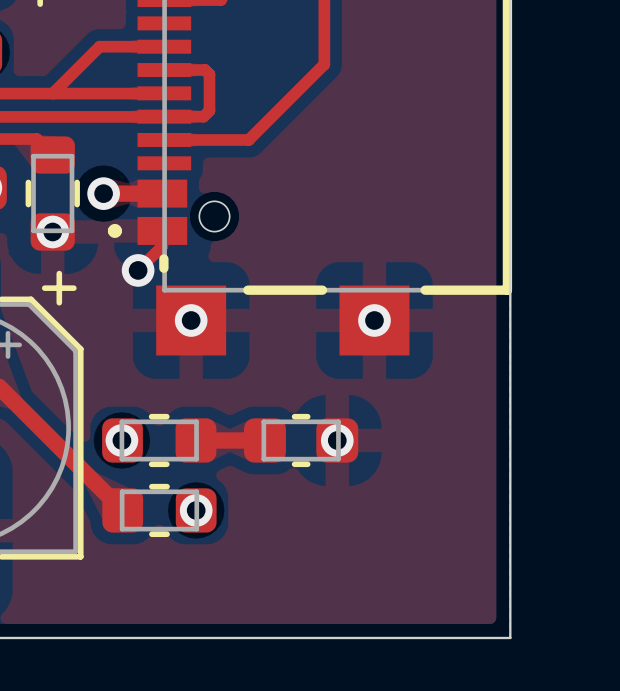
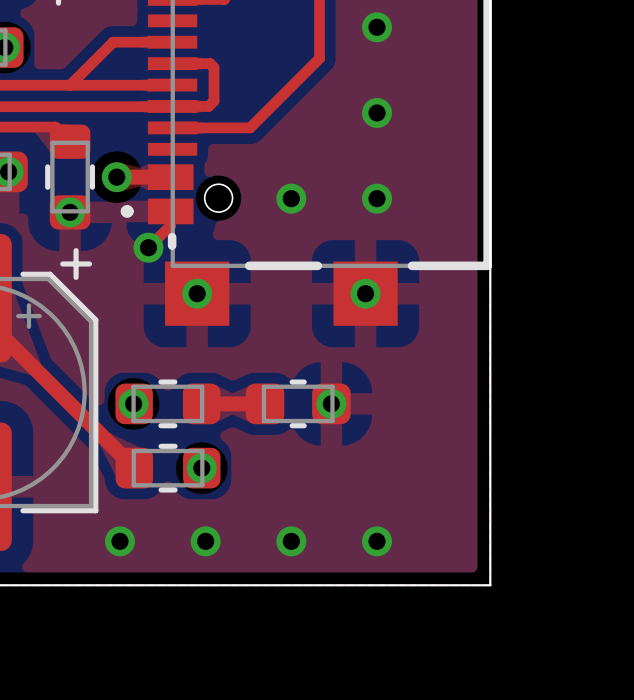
via: none -> (377, 27)
via: none -> (377, 112)
via: none -> (291, 198)
via: none -> (377, 198)
via: none -> (119, 541)
via: none -> (205, 541)
via: none -> (291, 541)
via: none -> (377, 541)

